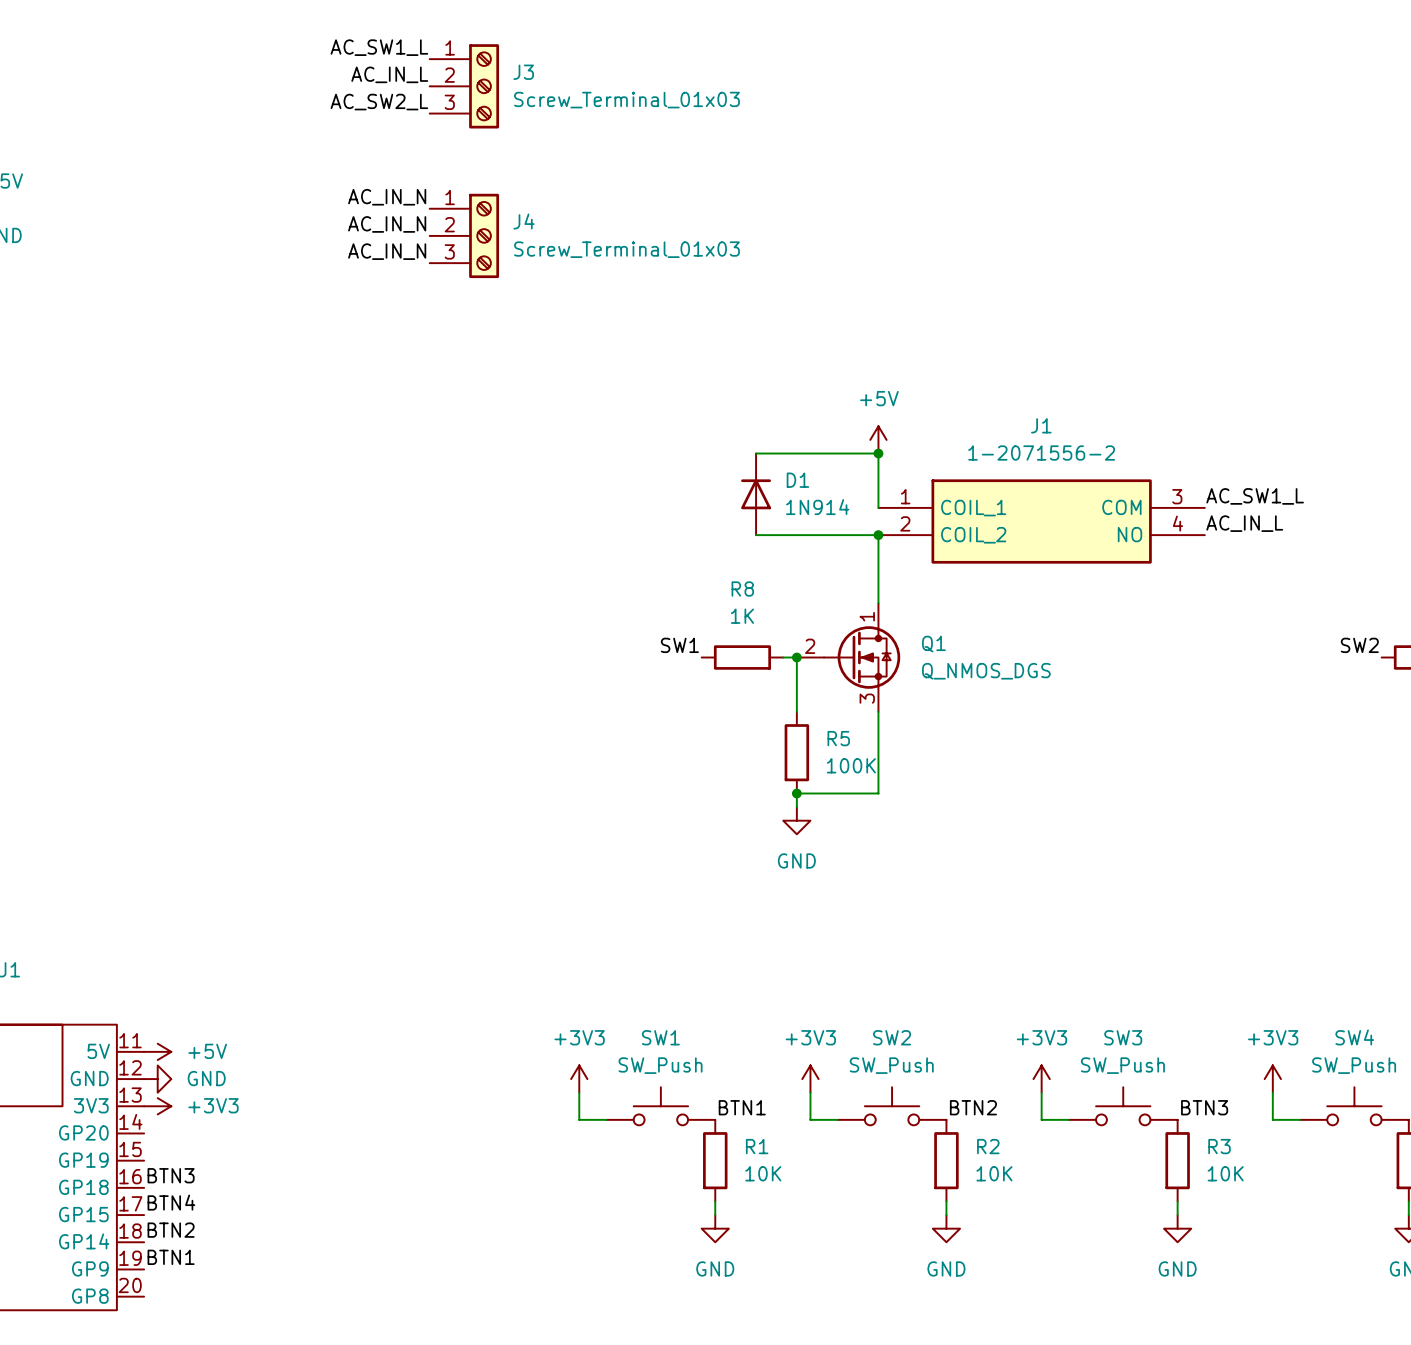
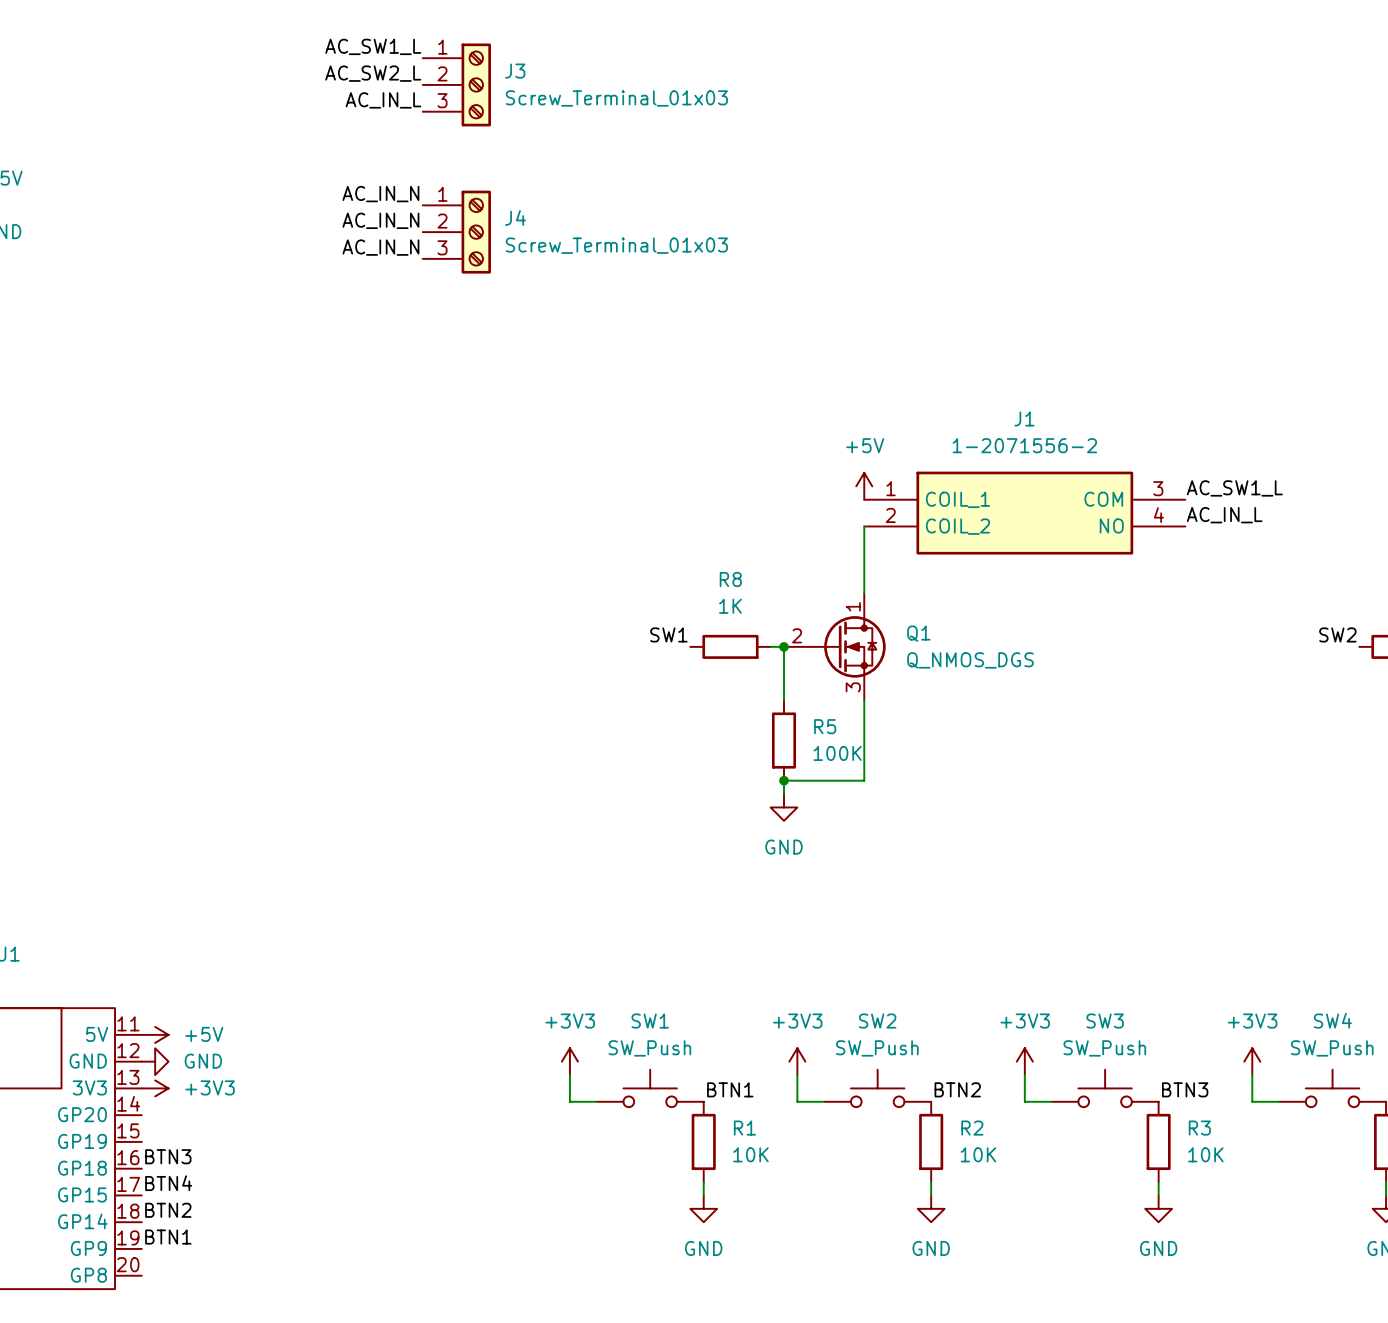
label: AC_IN_L (389, 74) -> AC_SW2_L (373, 73)
label: AC_SW2_L (379, 102) -> AC_IN_L (383, 100)
power symbol position: +5V (878, 439) -> +5V (864, 486)
wire: (756, 453) (878, 453) (878, 507) -> none
junction: (878, 453) -> none
D1: 1N914 (756, 494) -> none
wire: (756, 535) (878, 535) -> none
junction: (878, 535) -> none

